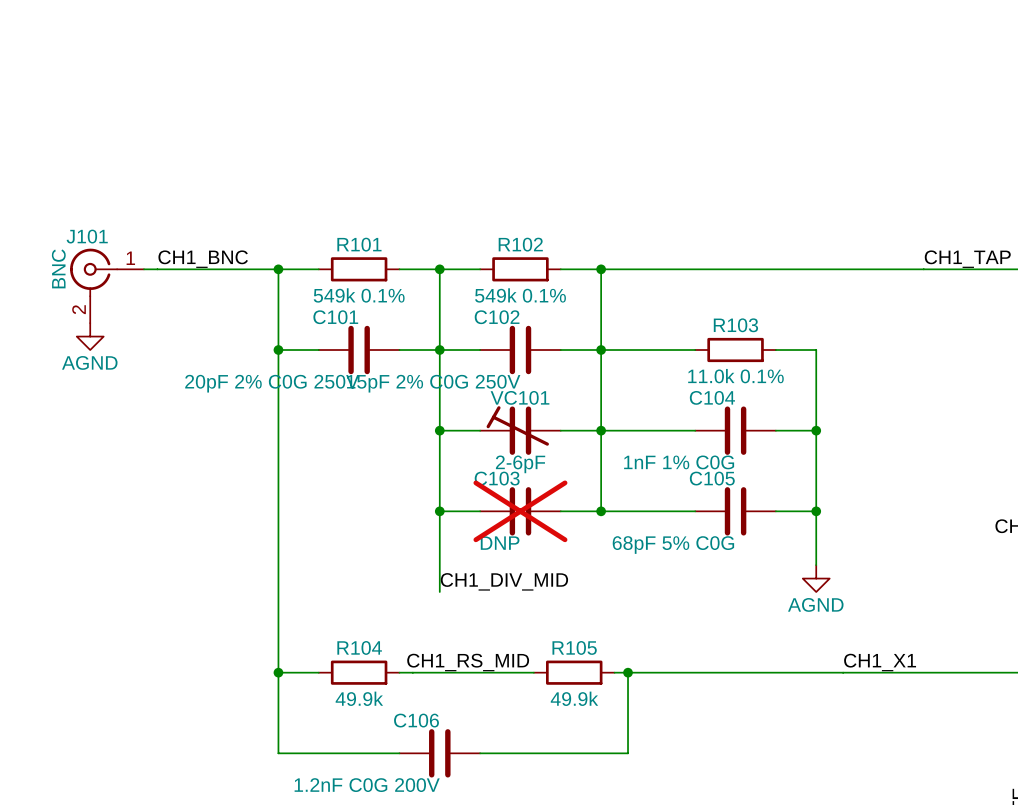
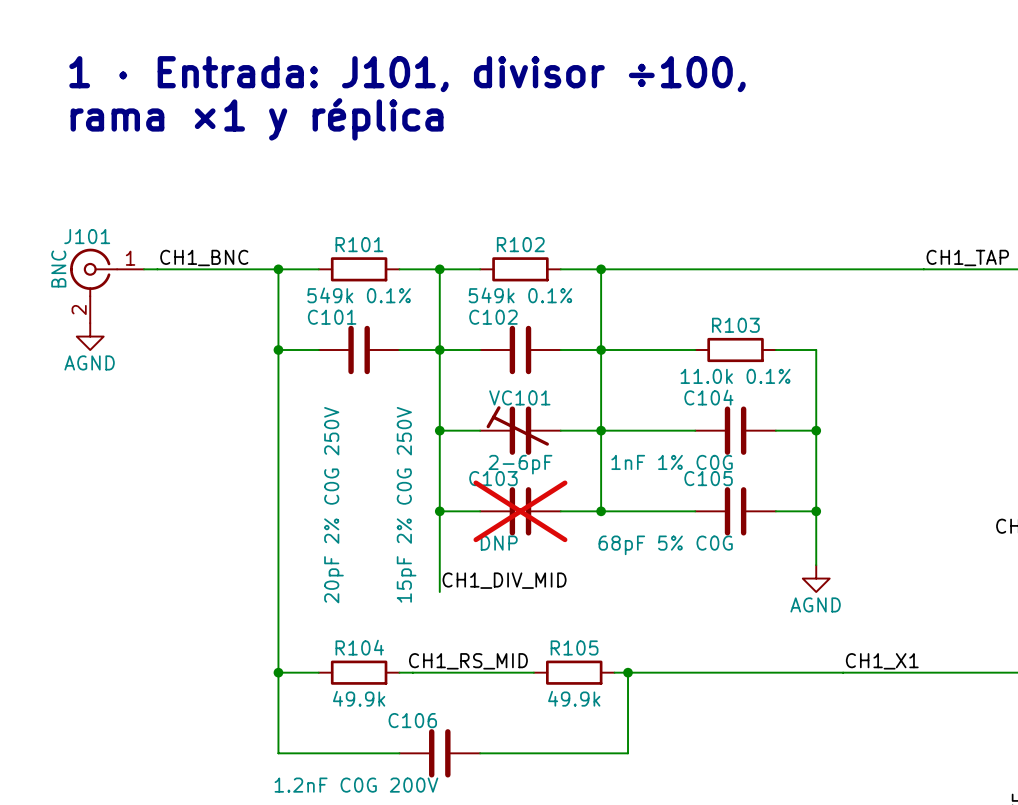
text: none -> 1 · Entrada: J101, divisor ÷100, (407, 74)
text: none -> rama ×1 y réplica (257, 119)
C101 value rotation: 0° (272, 383) -> 90° counterclockwise (333, 505)
C102 value rotation: 0° (433, 383) -> 90° counterclockwise (406, 504)

